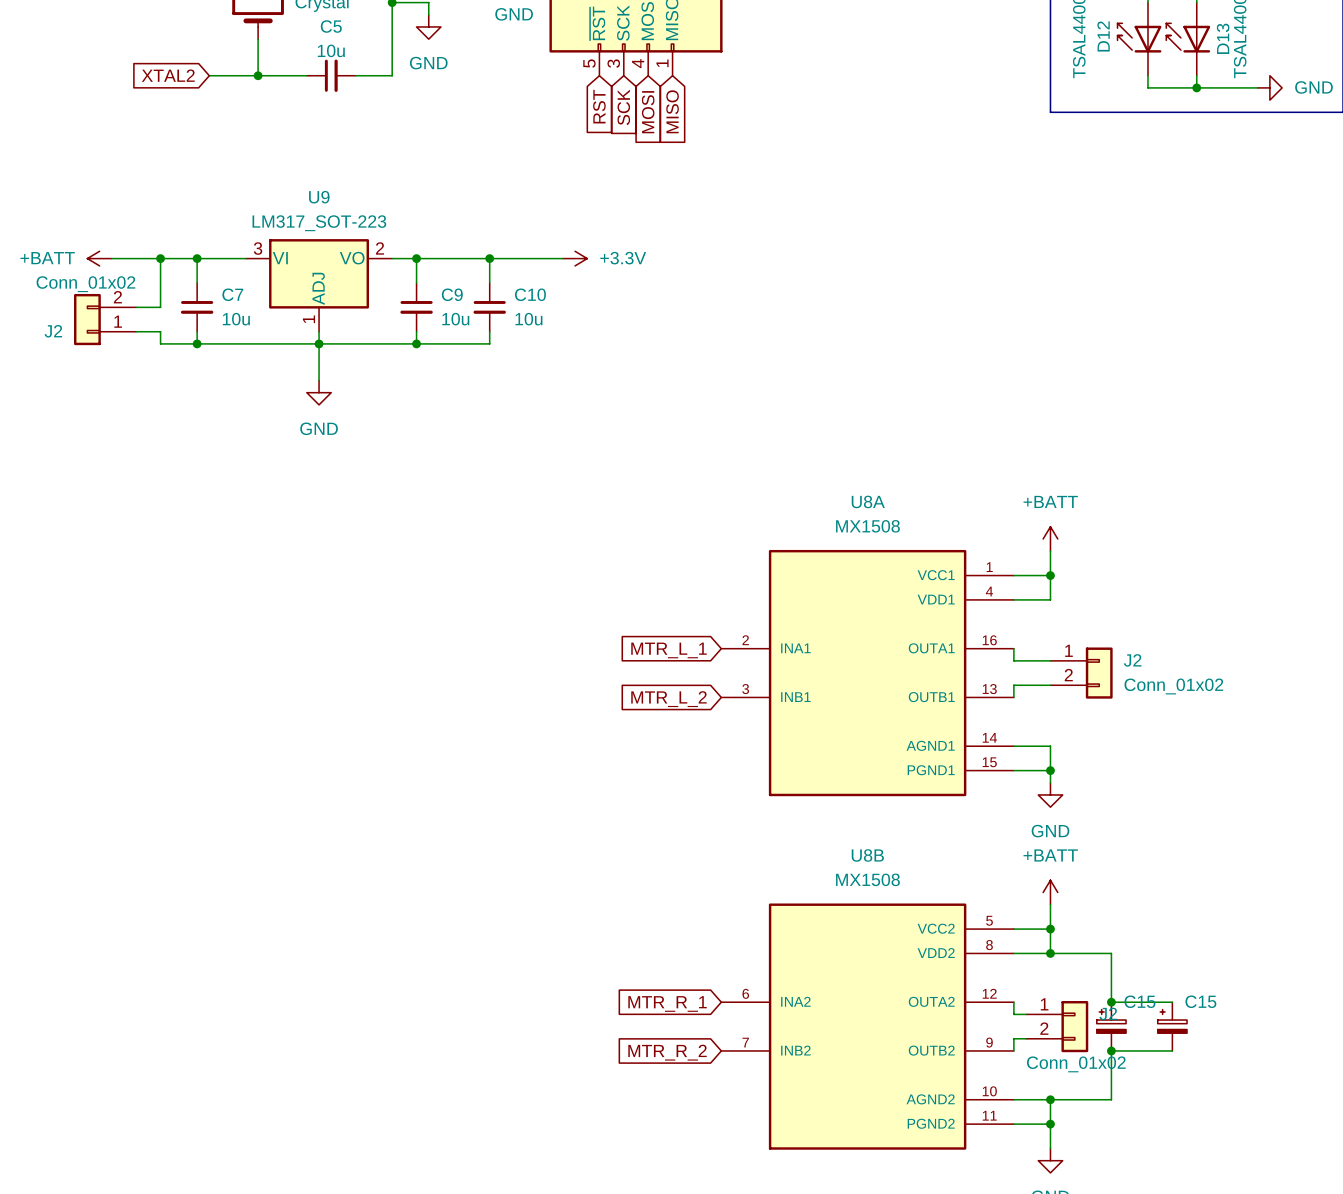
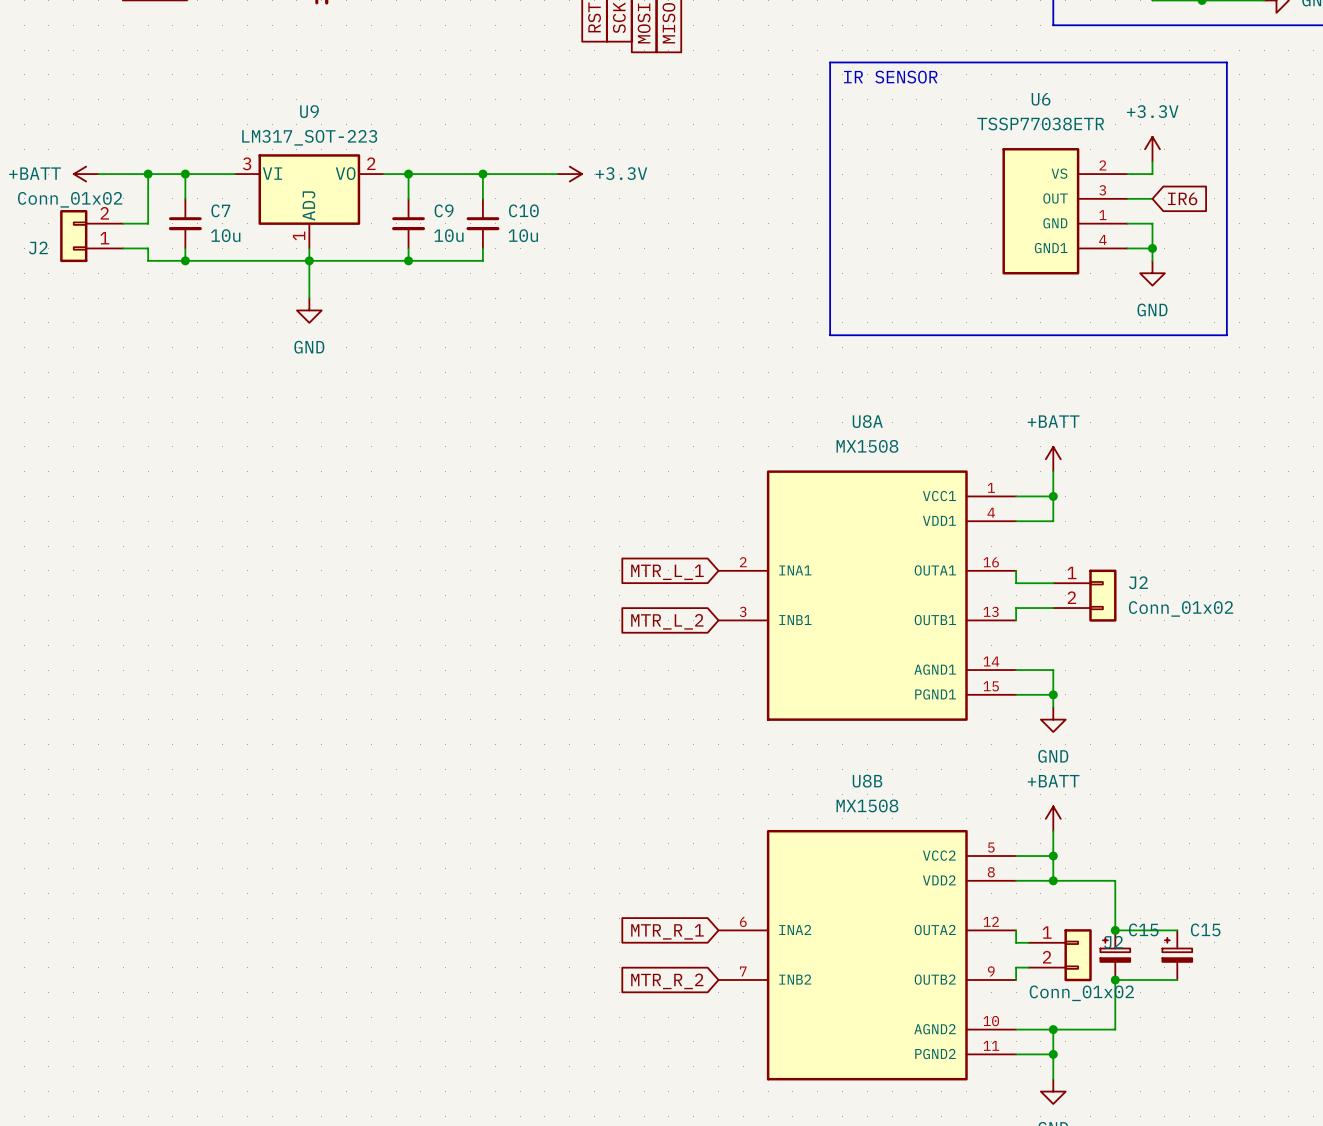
line: none -> (830, 62) (1226, 62) (1226, 335) (830, 335) (830, 62)
text: none -> IR SENSOR (890, 77)
power symbol: none -> +3.3V (1152, 149)
wire: none -> (1152, 161) (1152, 174) (1127, 174)
wire: none -> (1127, 198) (1152, 198)
global label: none -> IR6 (1182, 198)
U6: none -> TSSP77038ETR (1065, 211)
wire: none -> (1127, 223) (1152, 223) (1152, 260)
wire: none -> (1127, 248) (1152, 248)
junction: none -> (1152, 248)
power symbol: none -> GND (1152, 273)

